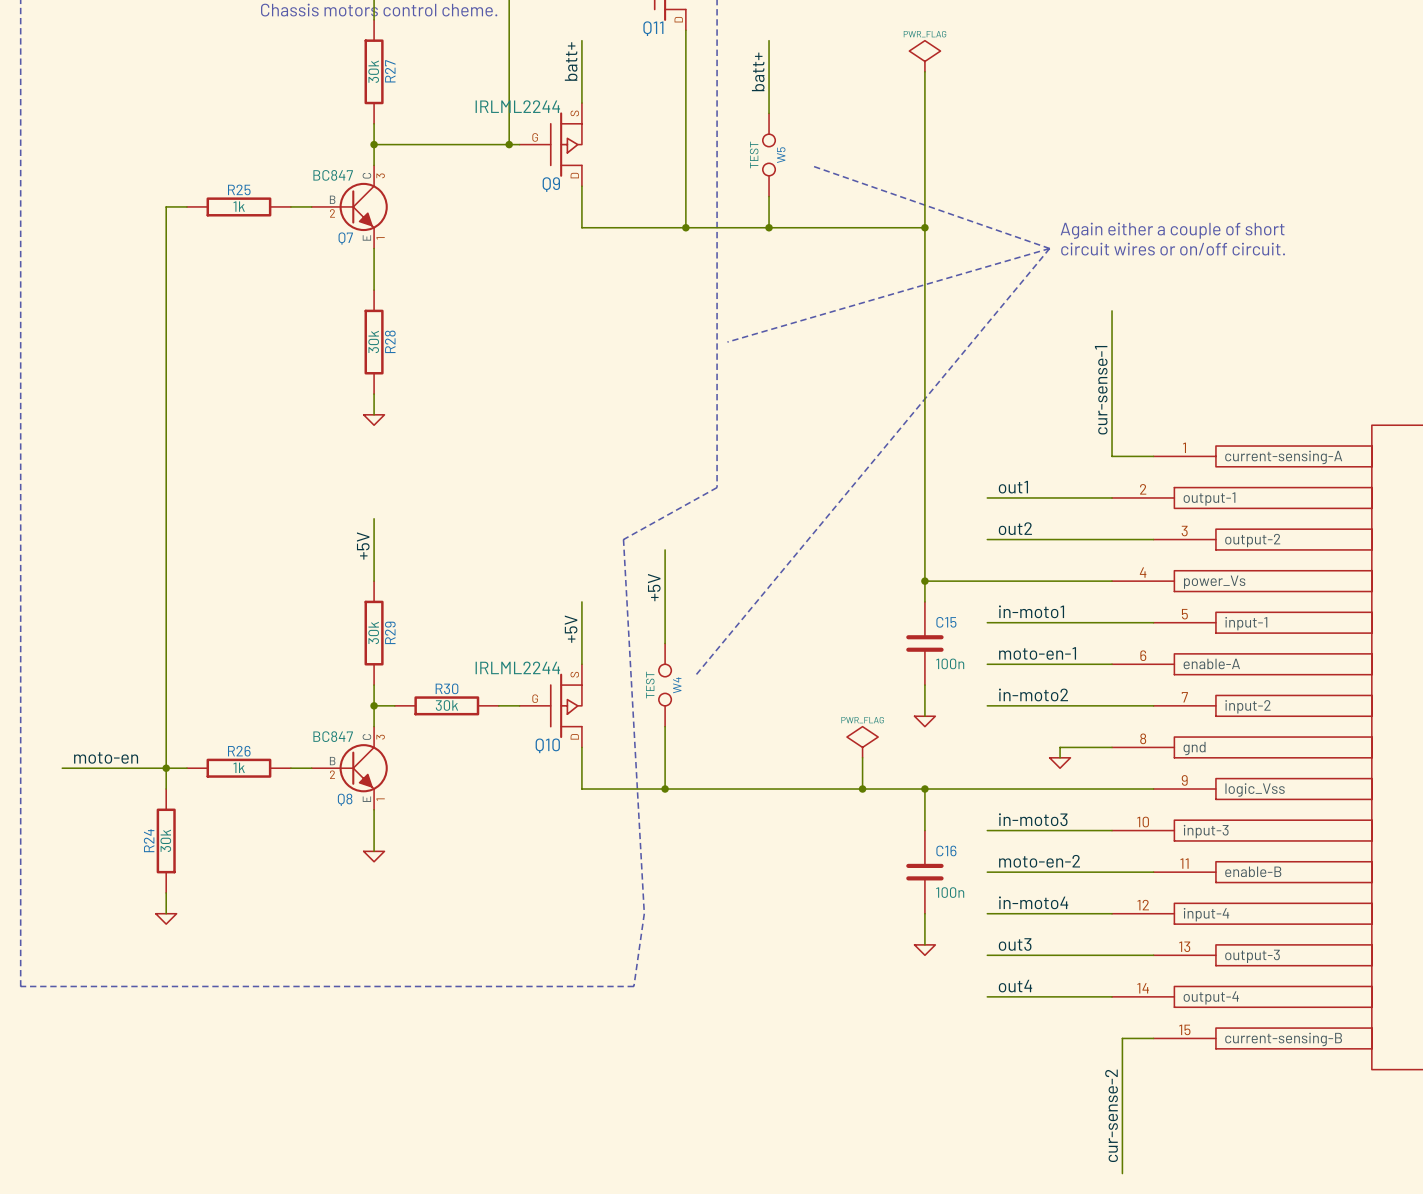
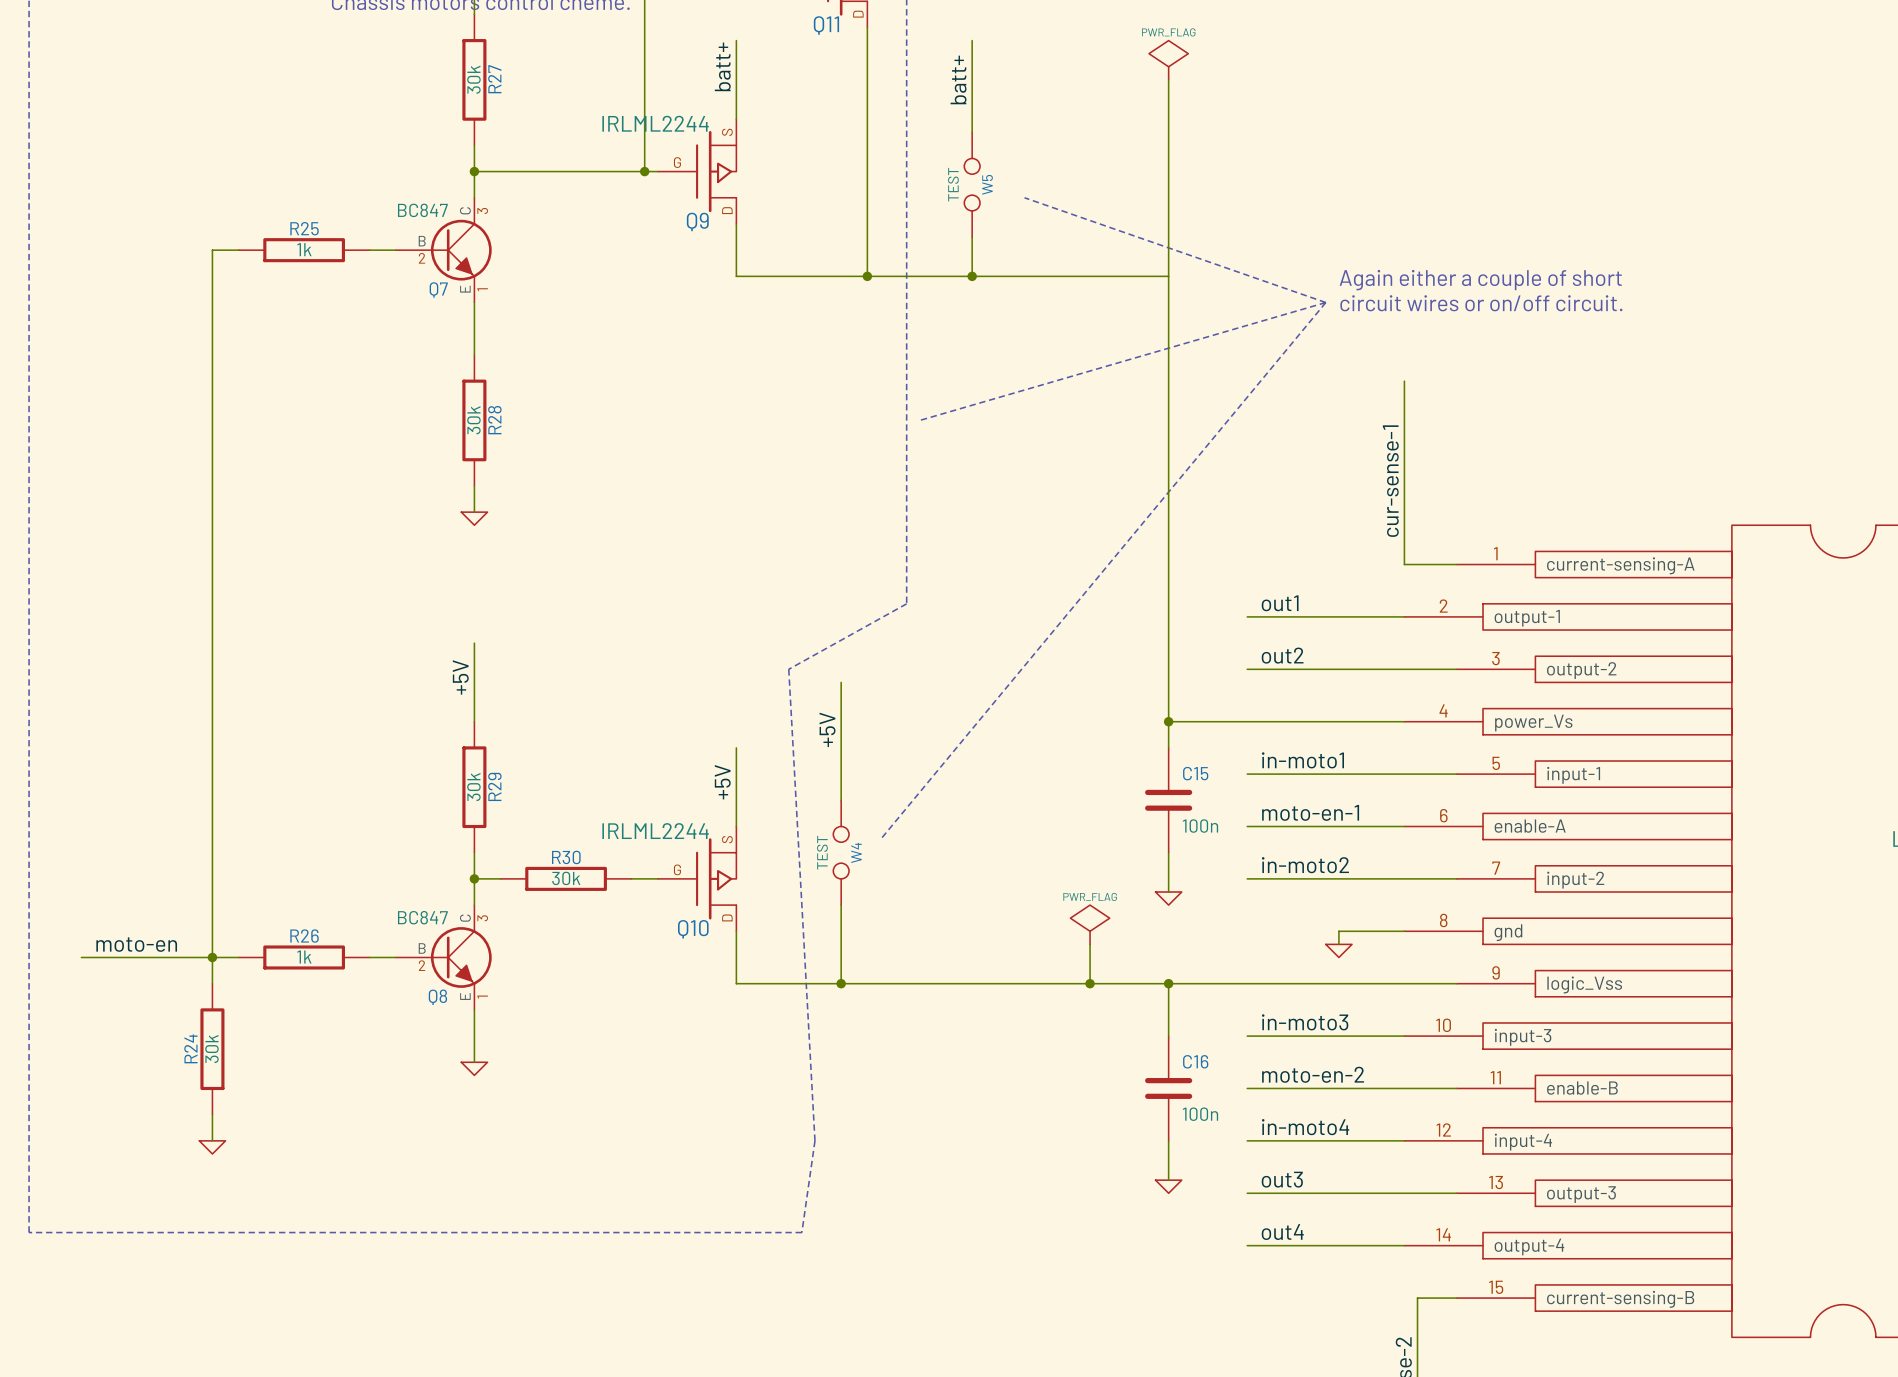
junction: (924, 227) -> none

